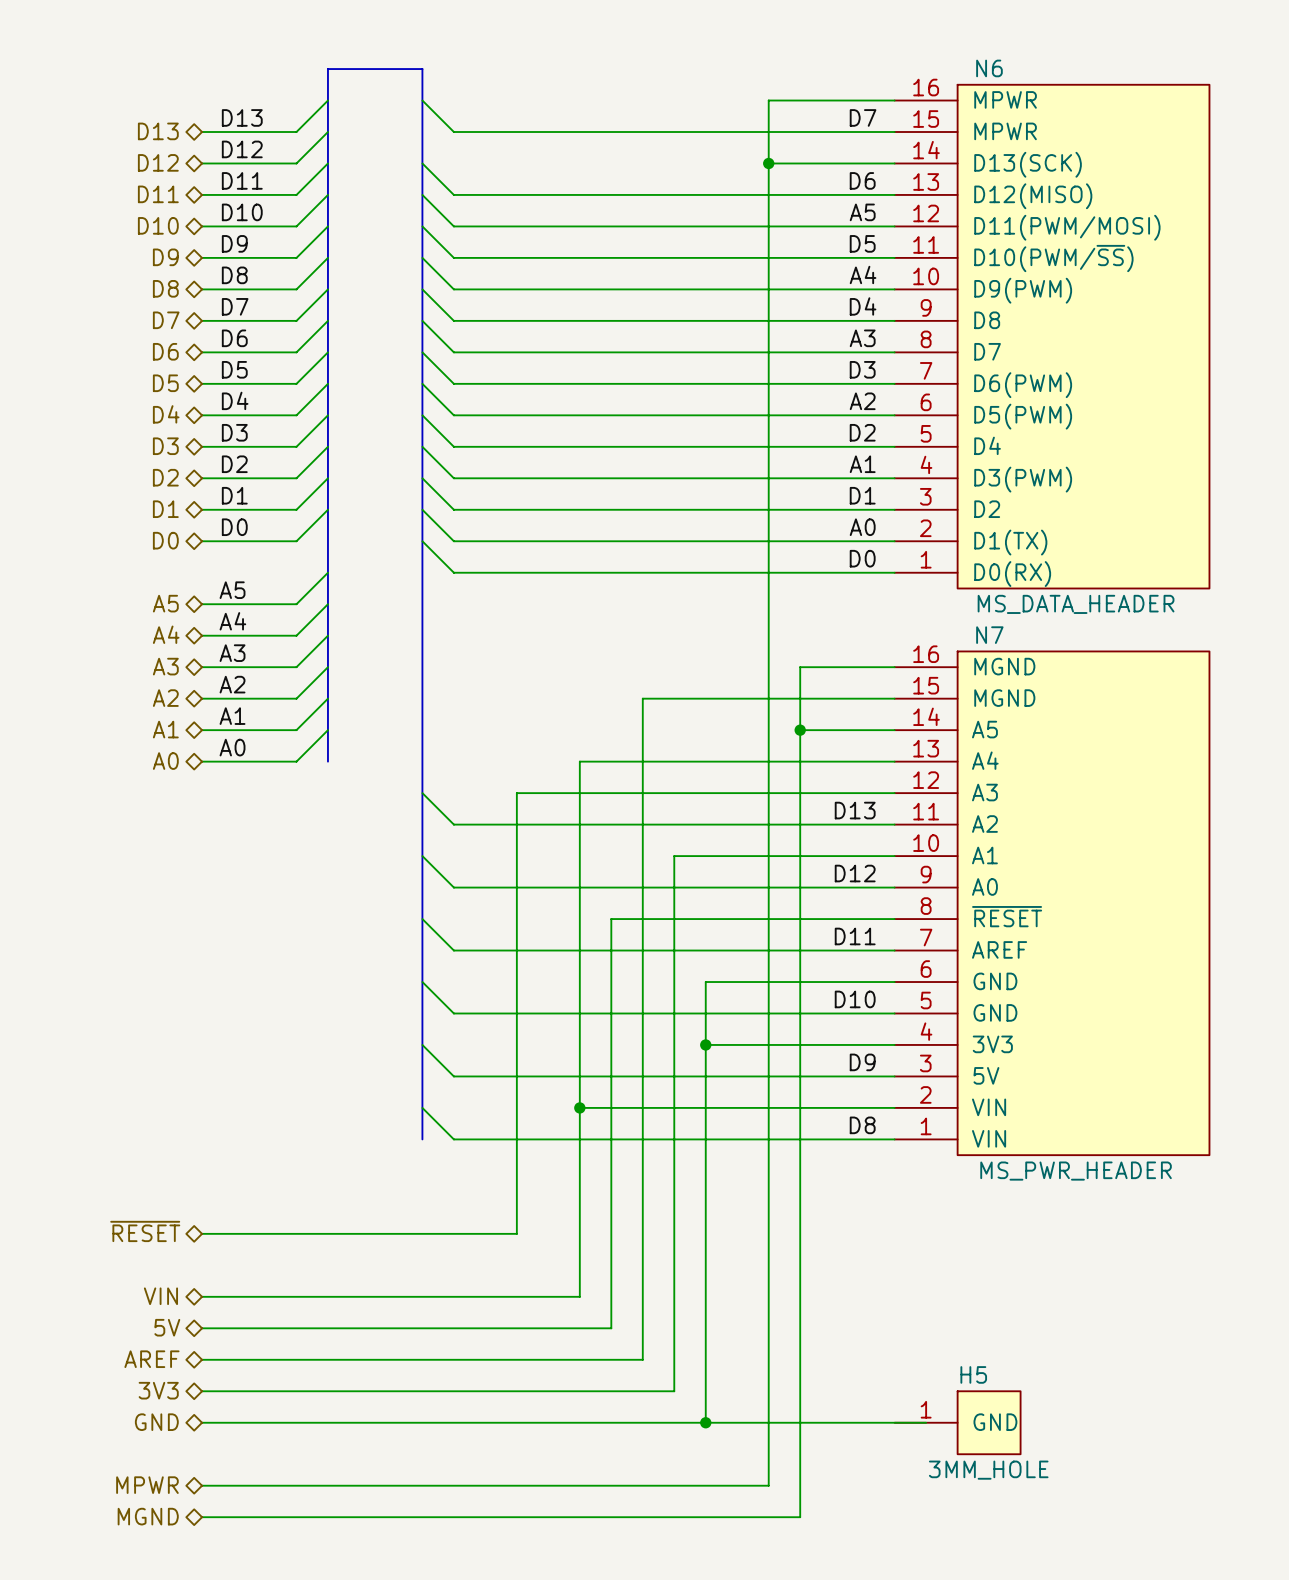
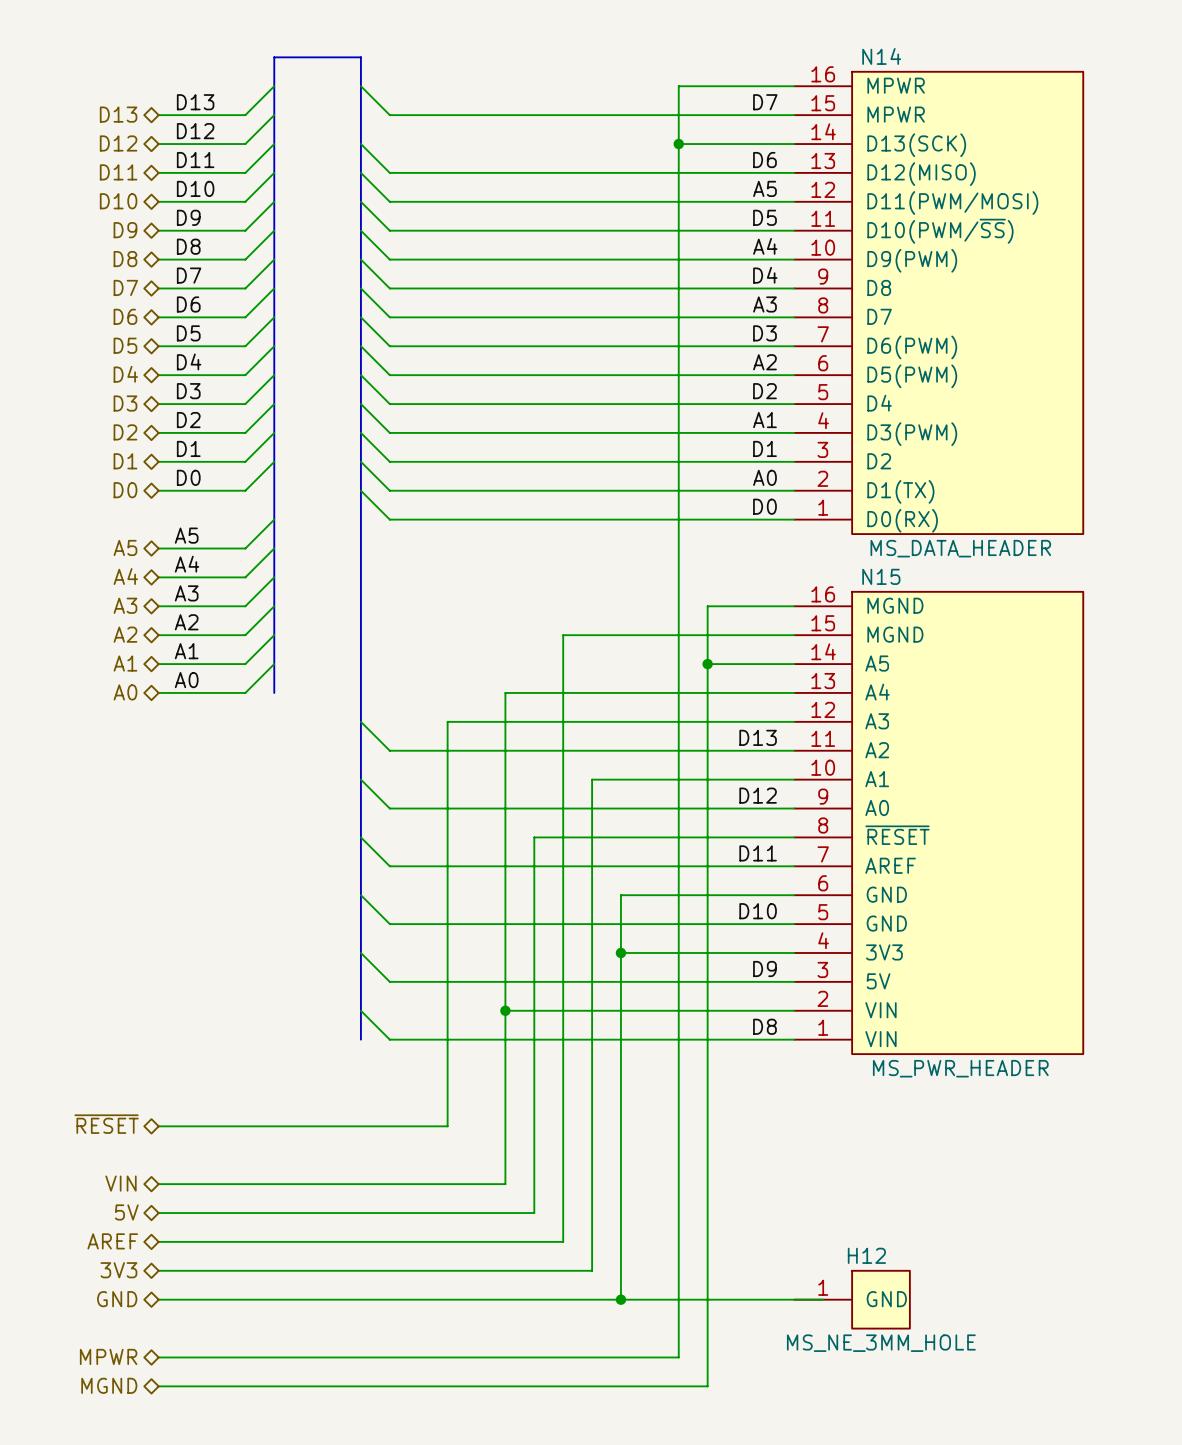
N6 name: N6 (989, 68) -> N14 (881, 56)
N7 name: N7 (989, 635) -> N15 (881, 576)
H5 name: H5 (973, 1374) -> H12 (866, 1255)
H5 value: 3MM_HOLE (988, 1470) -> MS_NE_3MM_HOLE (881, 1343)

